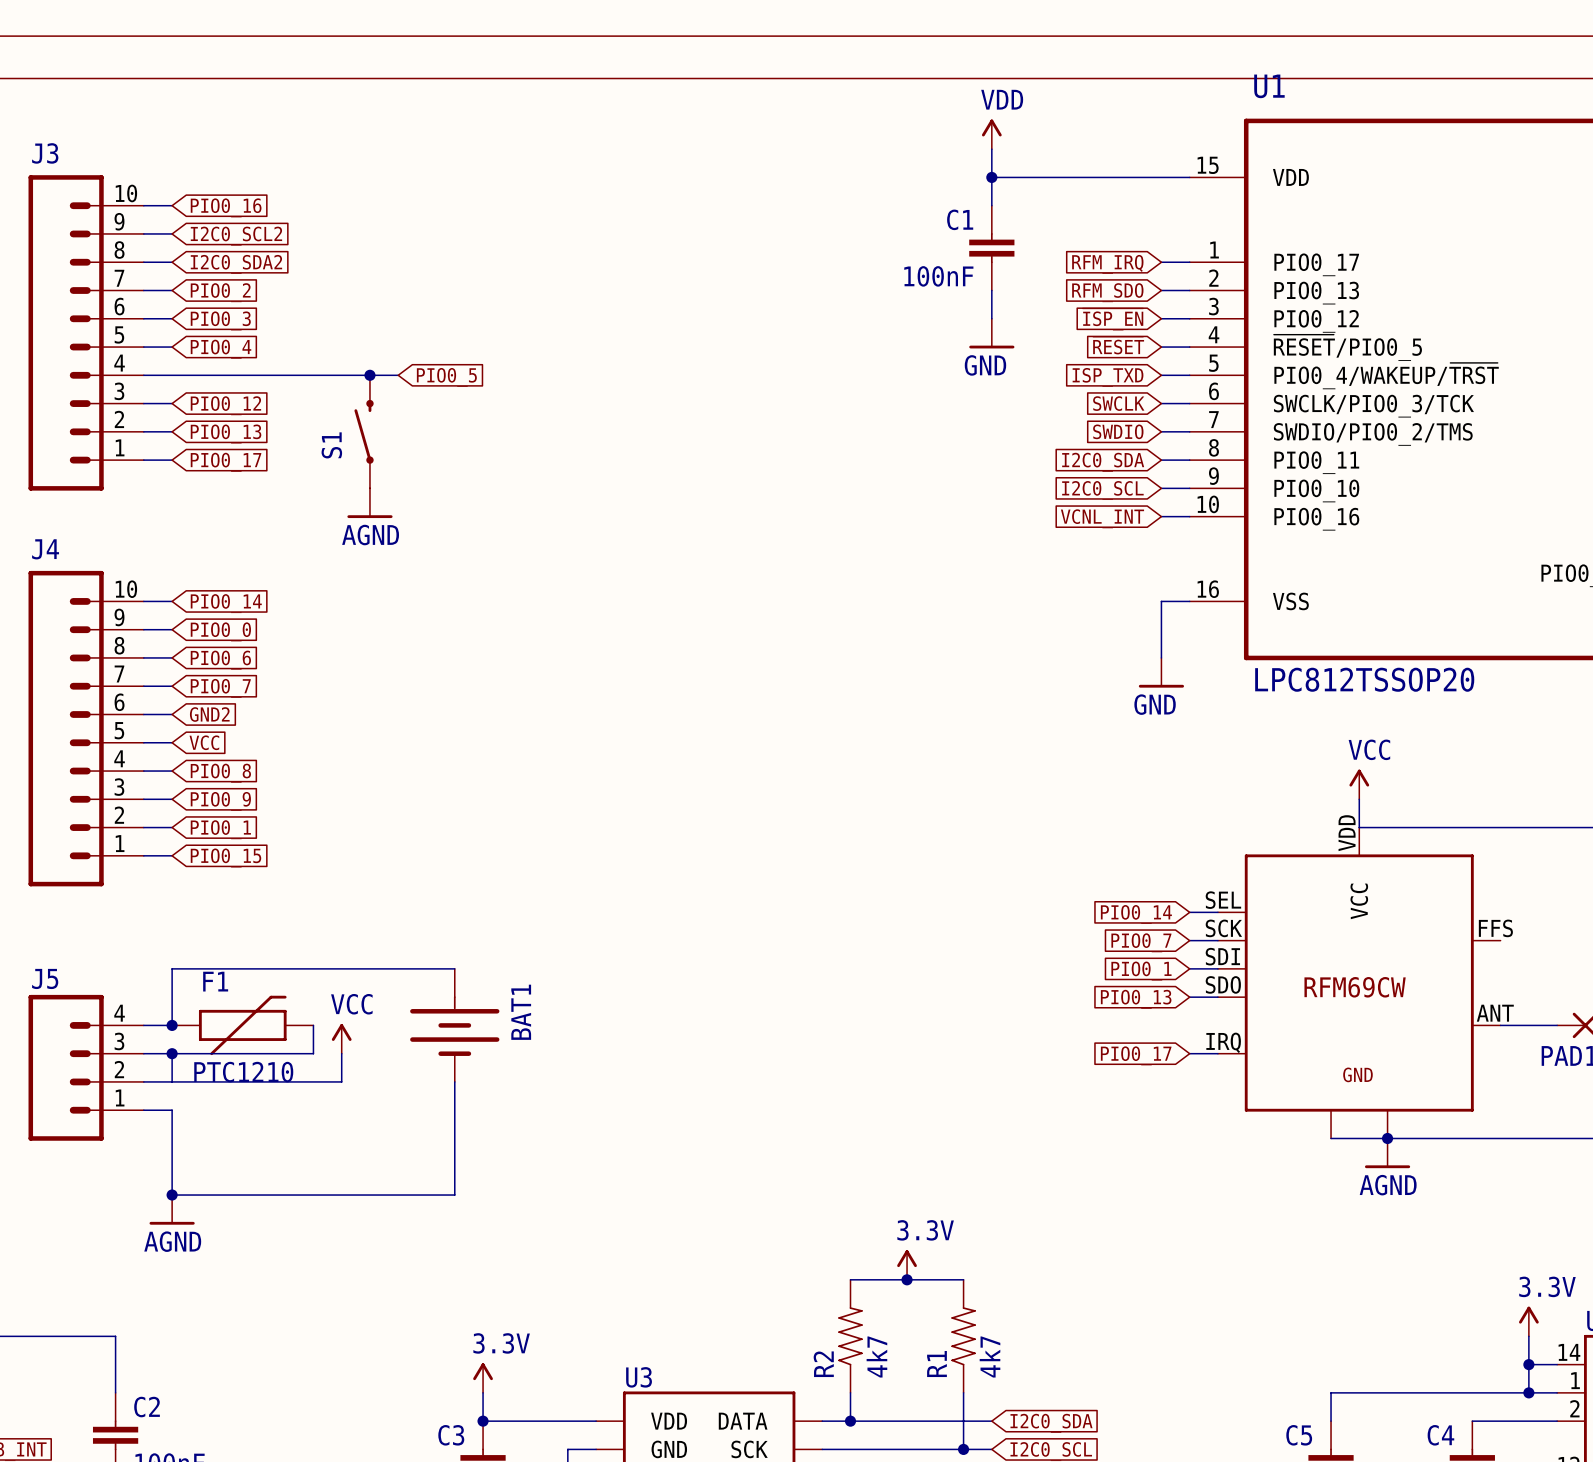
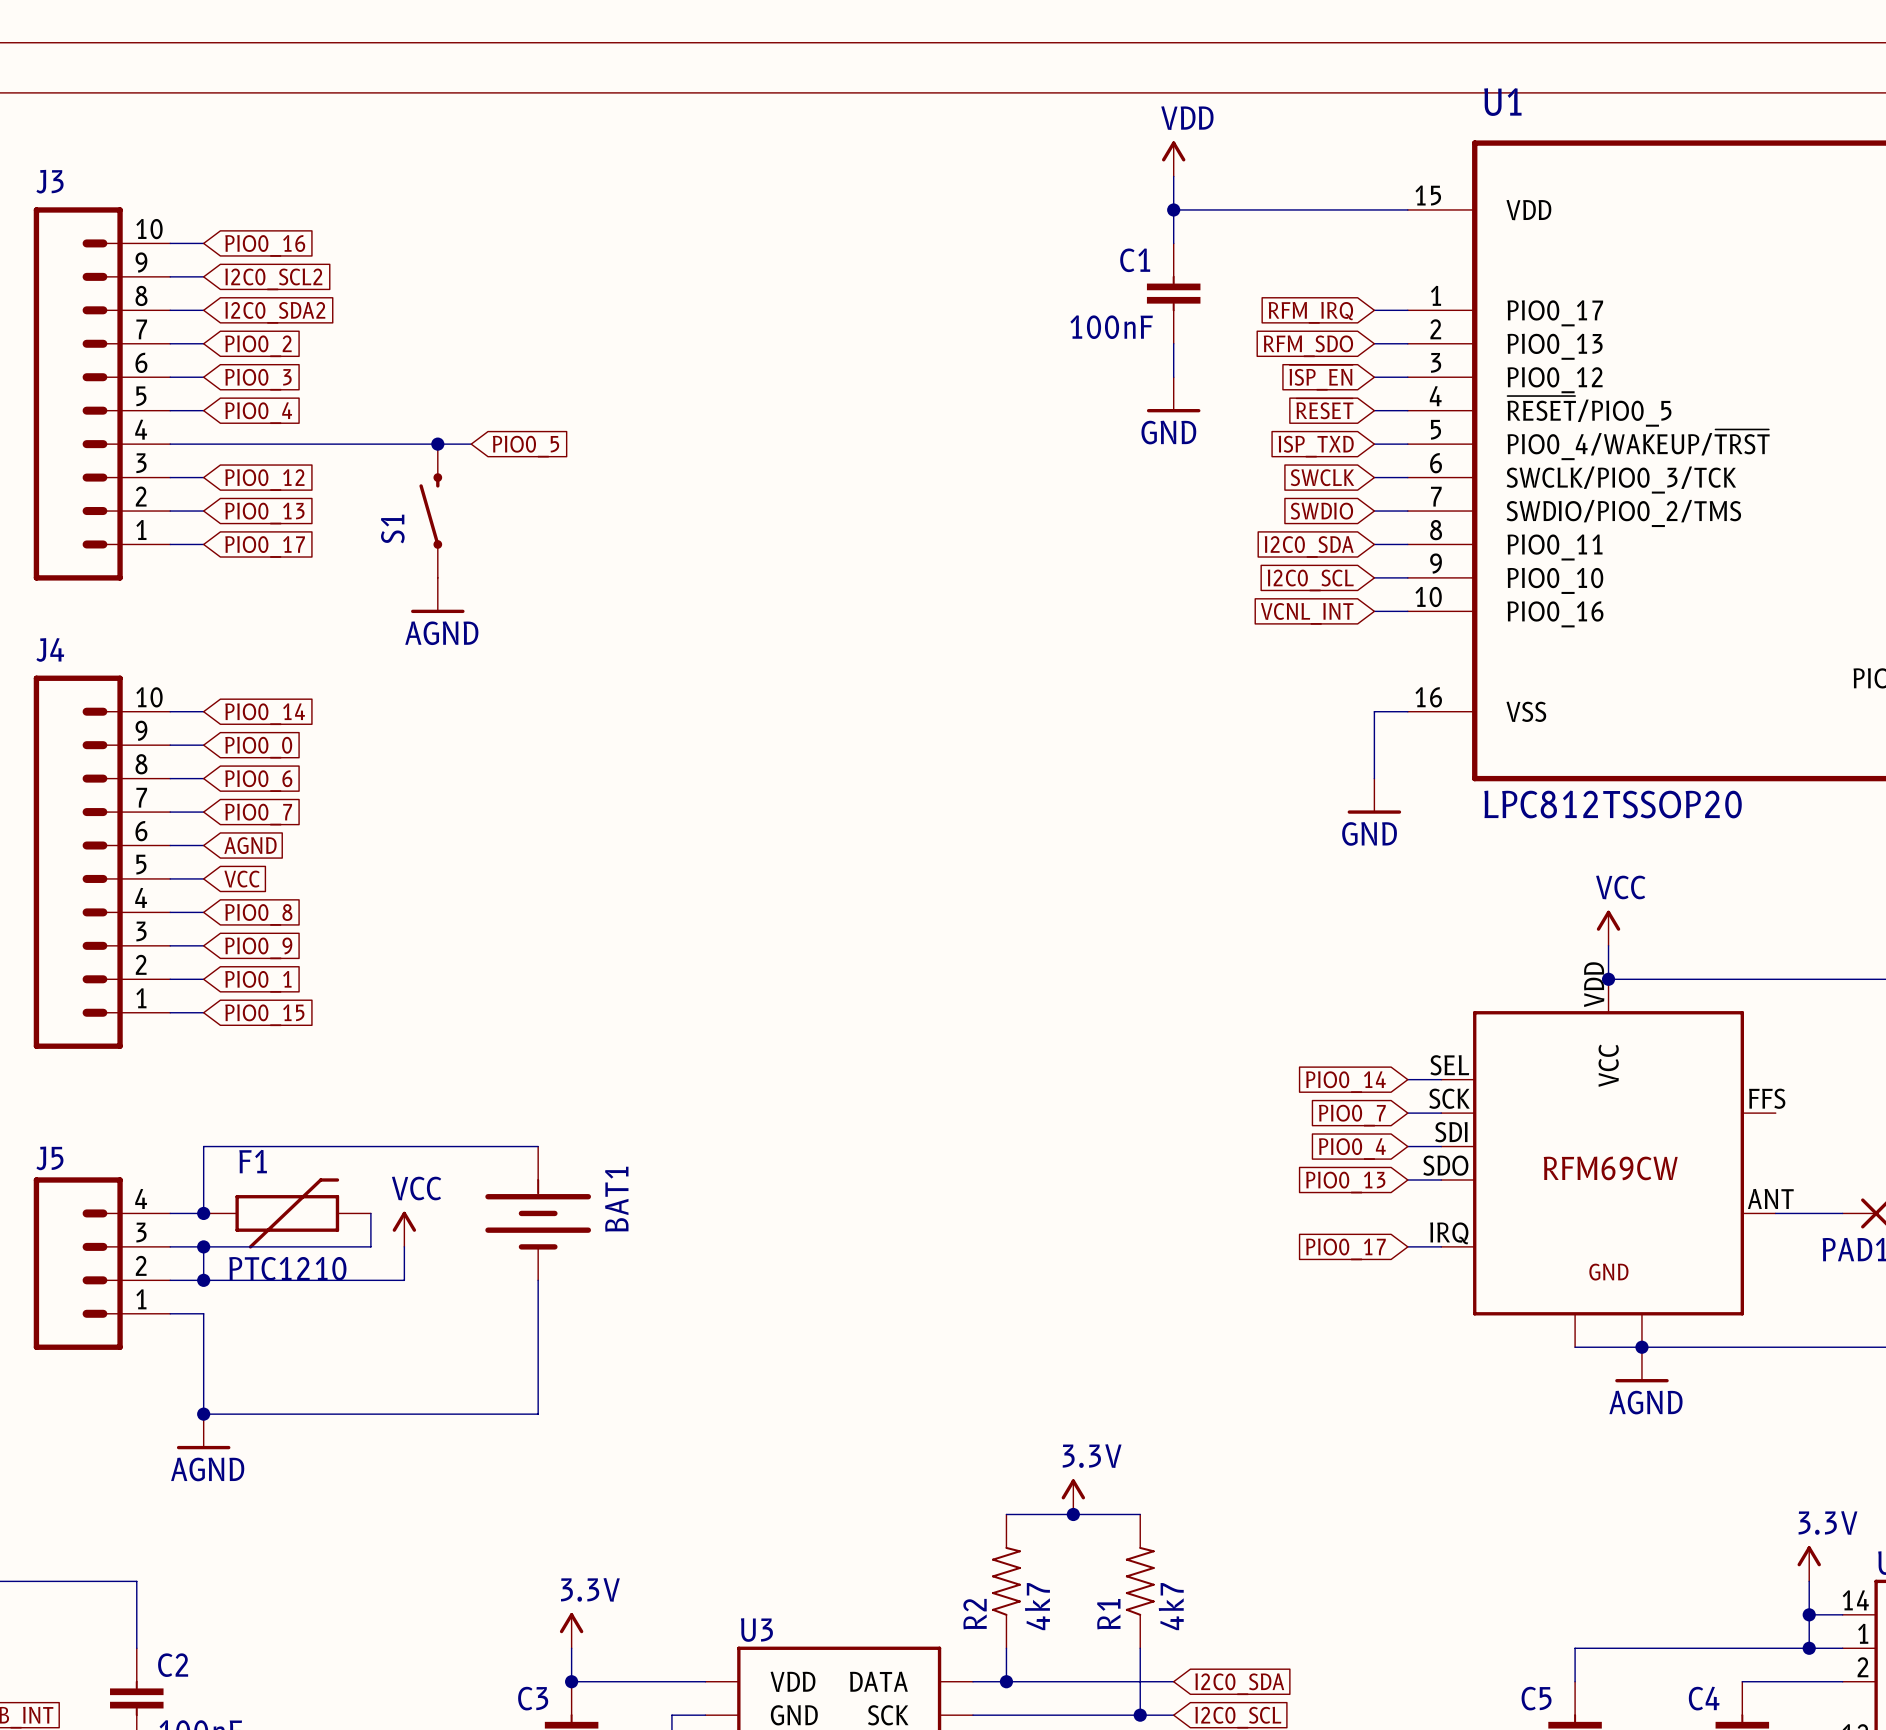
global label: GND2 (209, 714) -> AGND (250, 845)
junction: none -> (1608, 979)
global label: PIO0_1 (1141, 971) -> PIO0_4 (1352, 1149)
junction: none -> (203, 1280)

